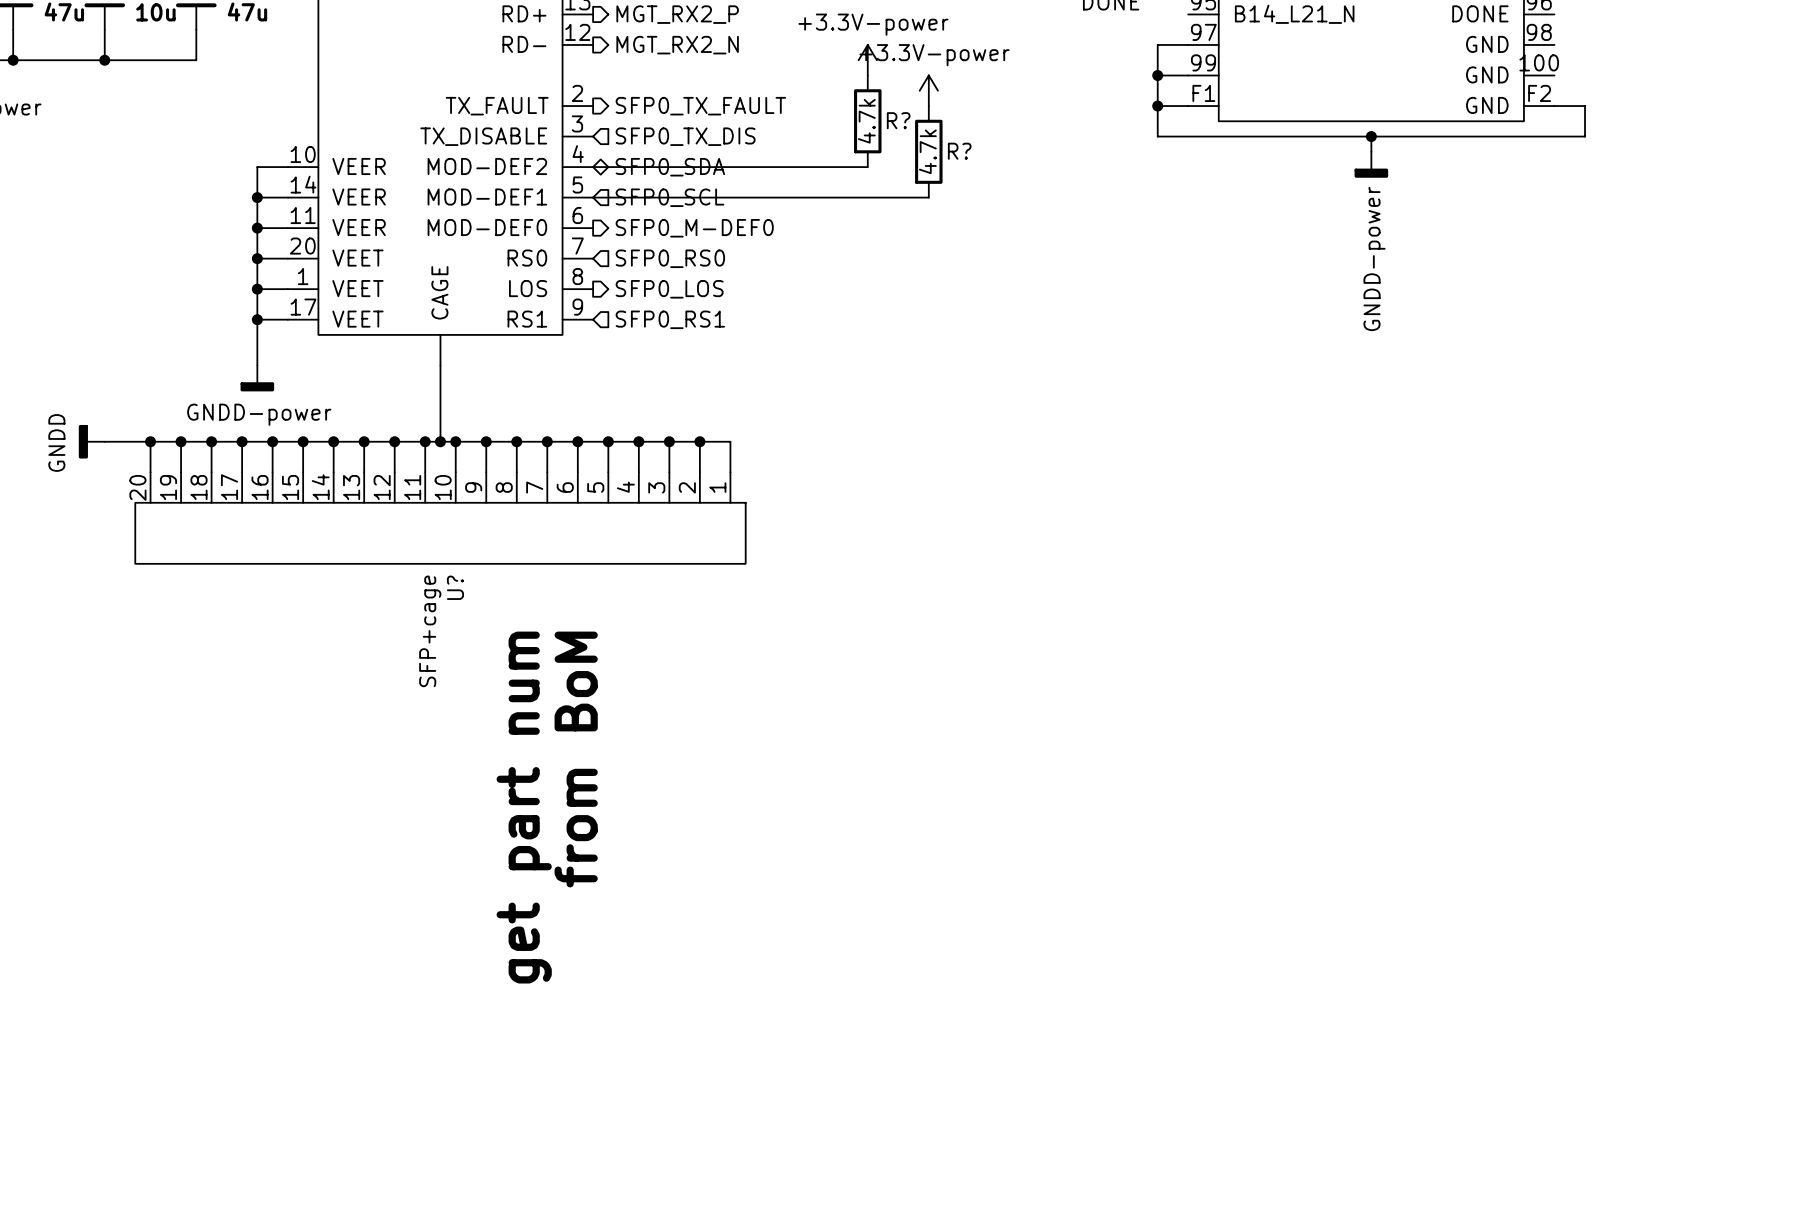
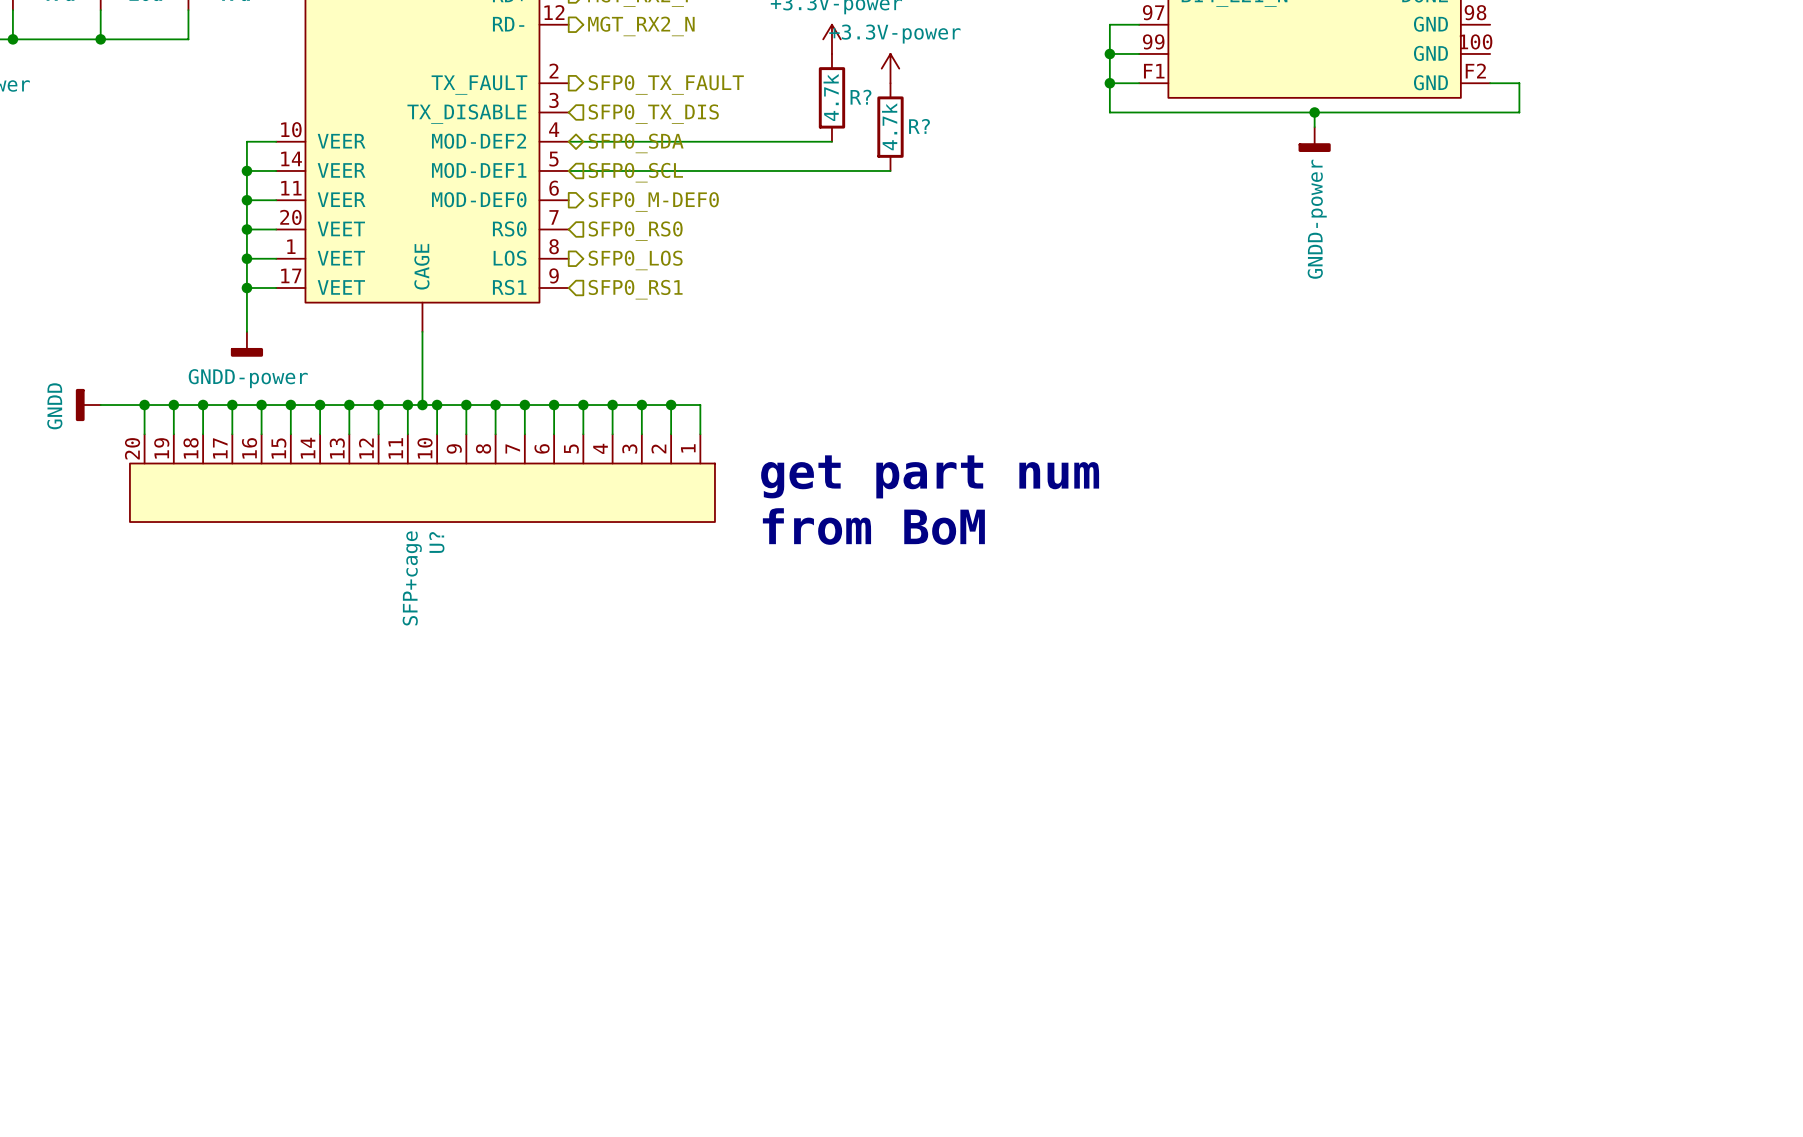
text rotation: 0° (576, 759) -> 90° clockwise (873, 526)
text position: from BoM (576, 759) -> from BoM (873, 526)
text rotation: 0° (524, 807) -> 90° clockwise (930, 476)
text position: get part num (524, 807) -> get part num (930, 476)

